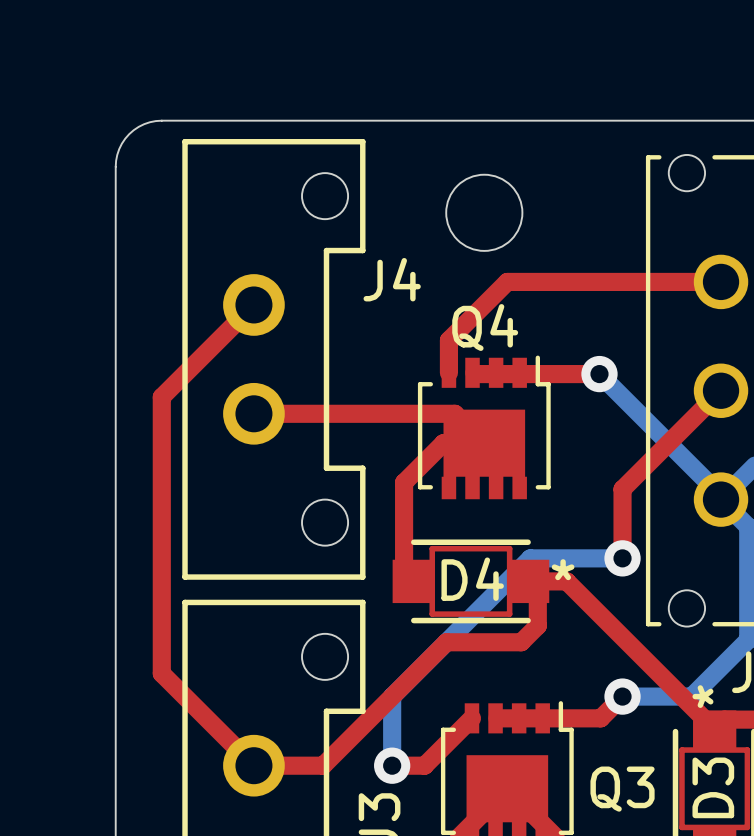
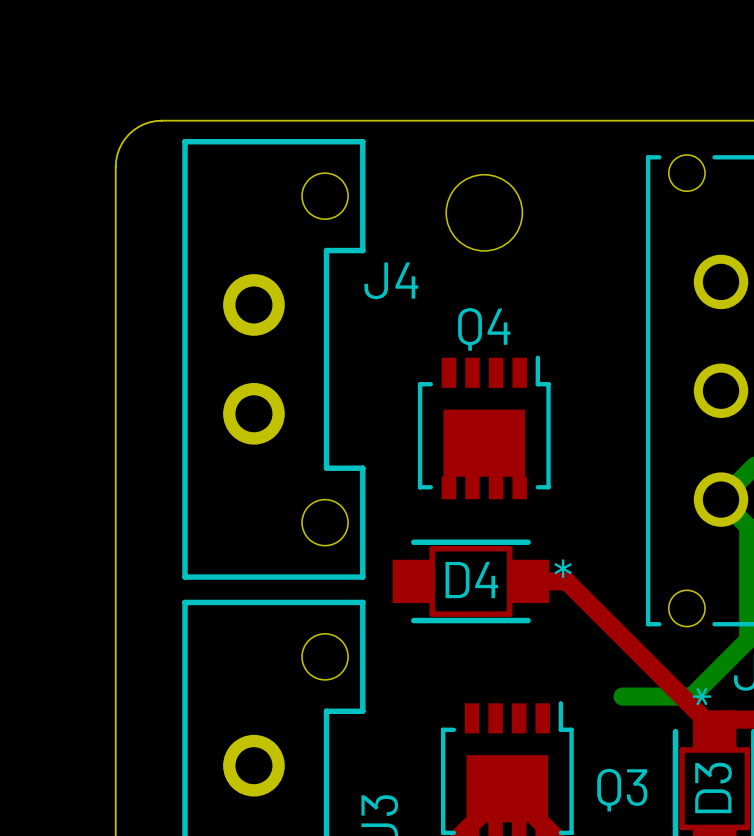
top track: (721, 281) (507, 281) (448, 340) (448, 372) -> none
top track: (253, 304) (161, 397) (161, 673) (253, 765) (323, 765) (446, 642) (521, 642) (537, 625) (537, 581) -> none
top track: (474, 372) (599, 374) -> none
bottom track: (599, 374) (721, 495) (721, 499) -> none
via: (599, 374) -> none
top track: (721, 390) (622, 489) (622, 558) -> none
top track: (253, 413) (454, 413) (484, 443) (443, 443) (404, 482) (404, 581) -> none
bottom track: (622, 558) (530, 558) (392, 696) (392, 765) -> none
via: (622, 558) -> none
top track: (622, 696) (600, 718) (497, 718) -> none
via: (622, 696) -> none
top track: (471, 718) (424, 765) (392, 765) -> none
via: (392, 765) -> none

